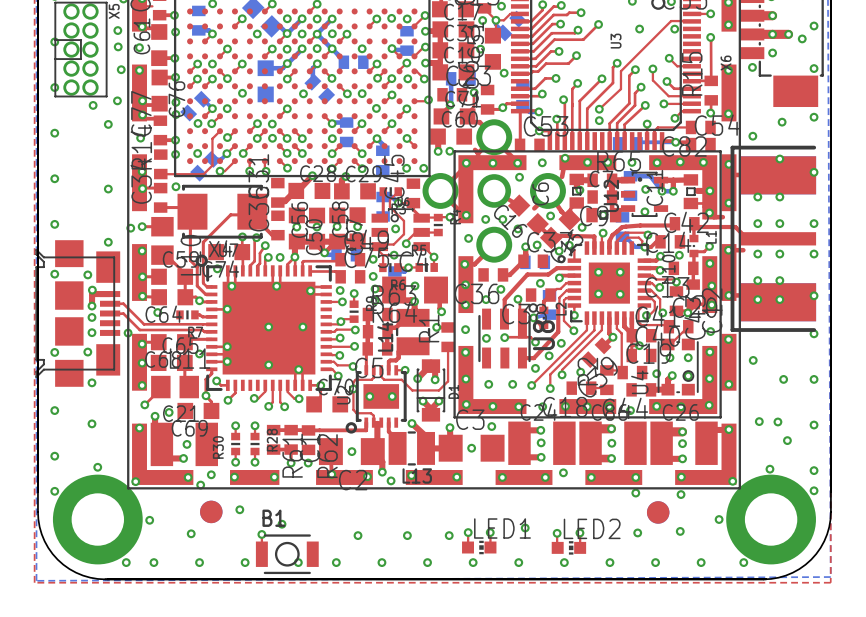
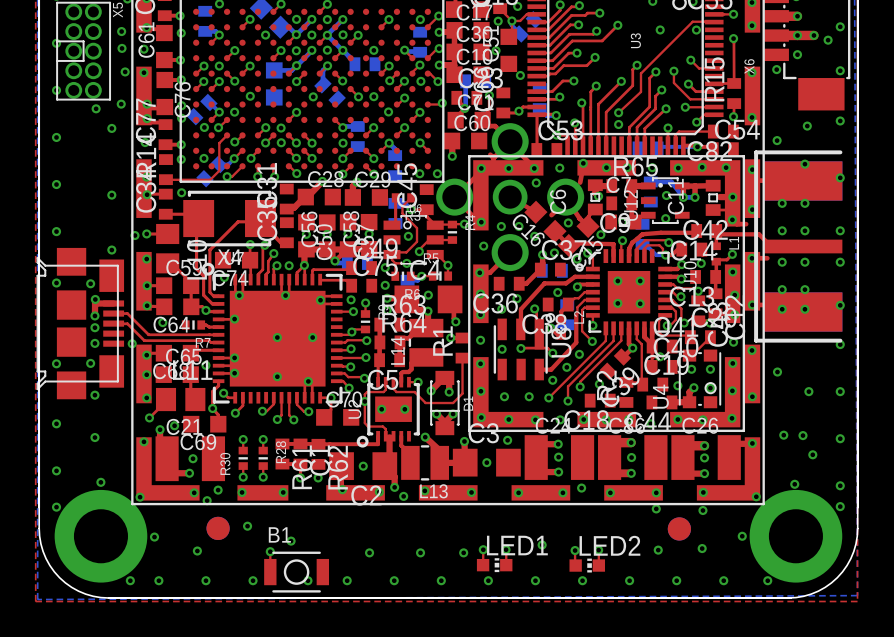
top track: (144, 6) (152, 6) -> none
via: (391, 18) -> none
via: (449, 151) -> none

